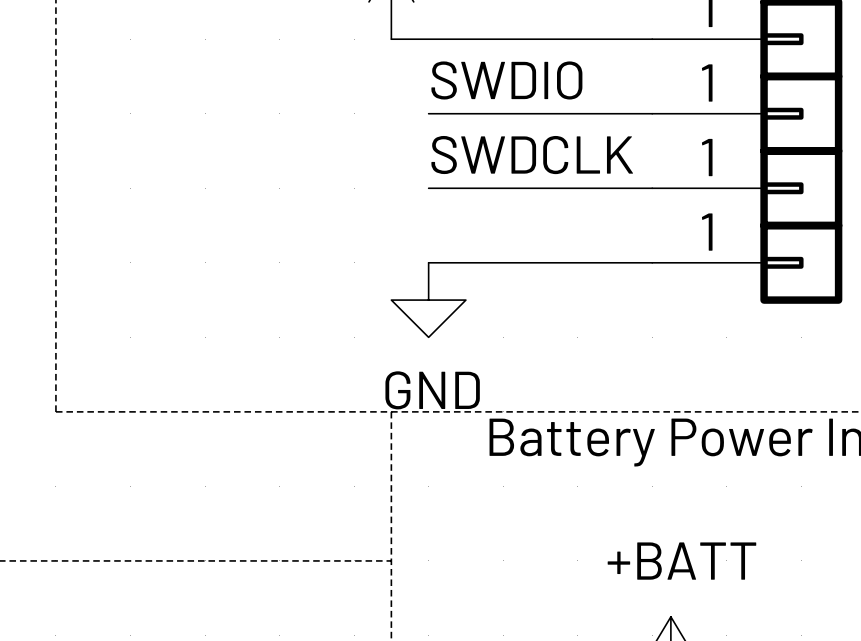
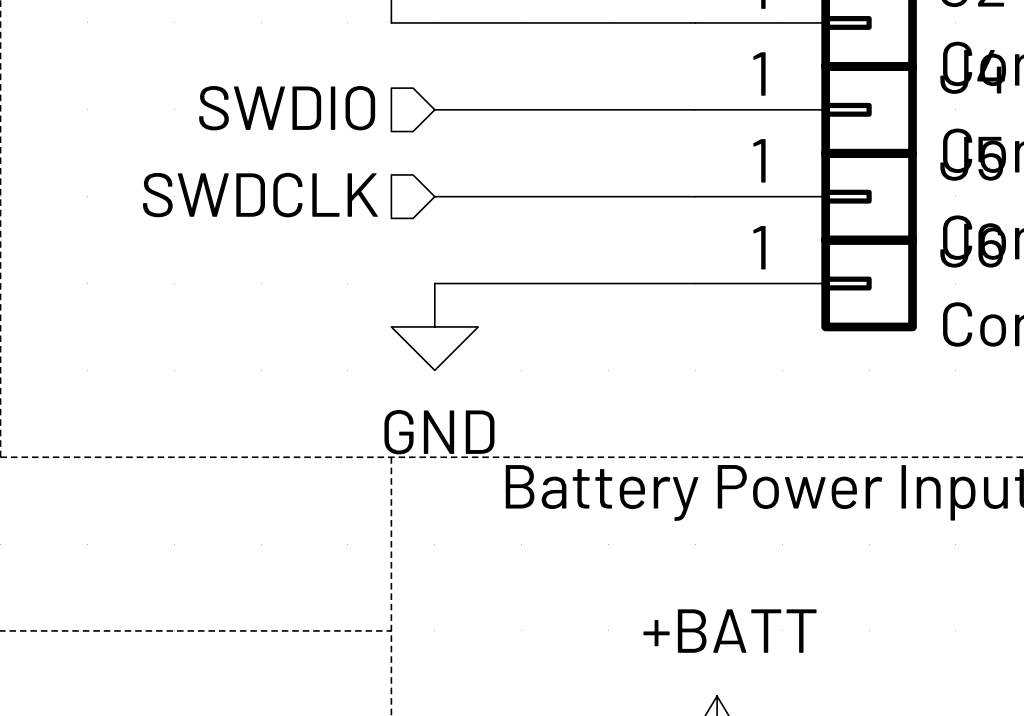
label: SWDIO (506, 80) -> none
hierarchical label: none -> SWDIO (287, 108)
label: SWDCLK (532, 155) -> none
hierarchical label: none -> SWDCLK (260, 195)

